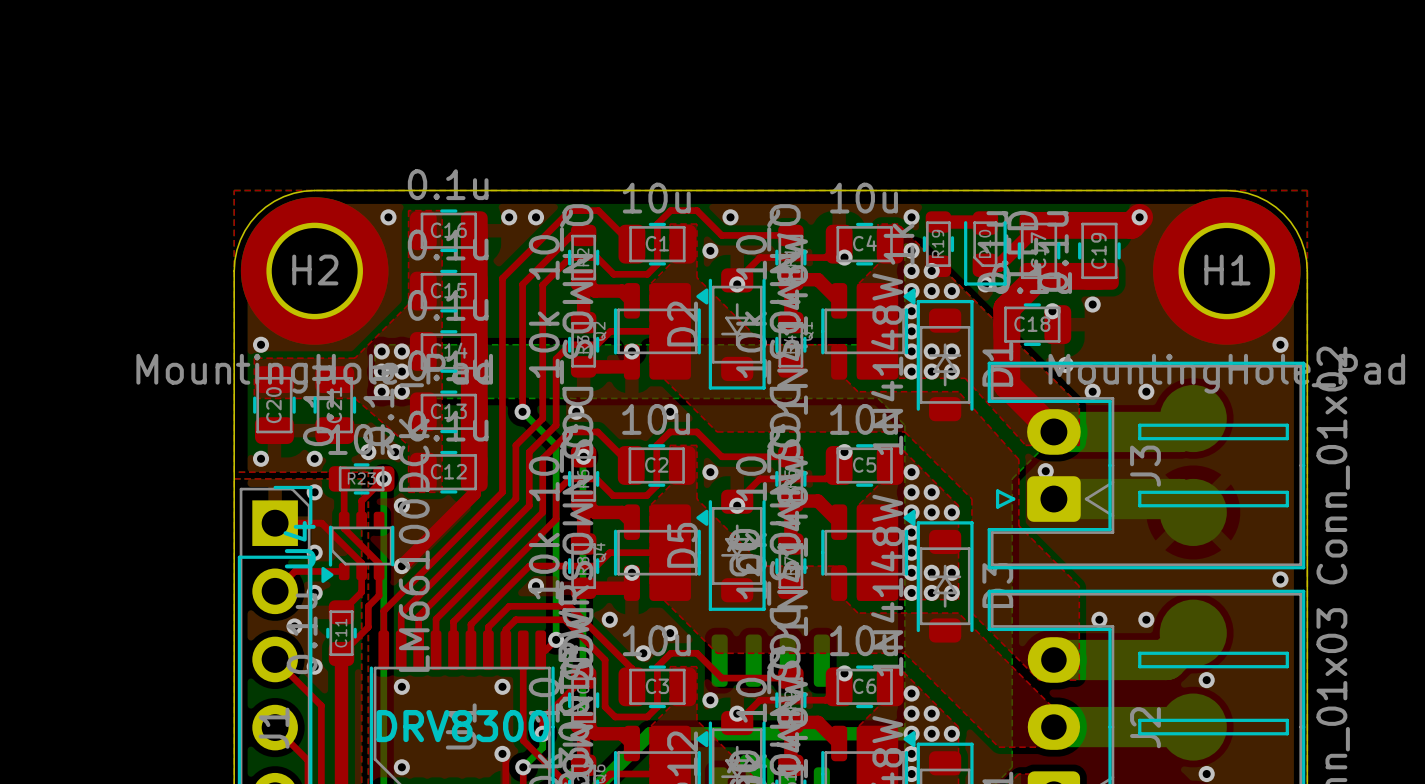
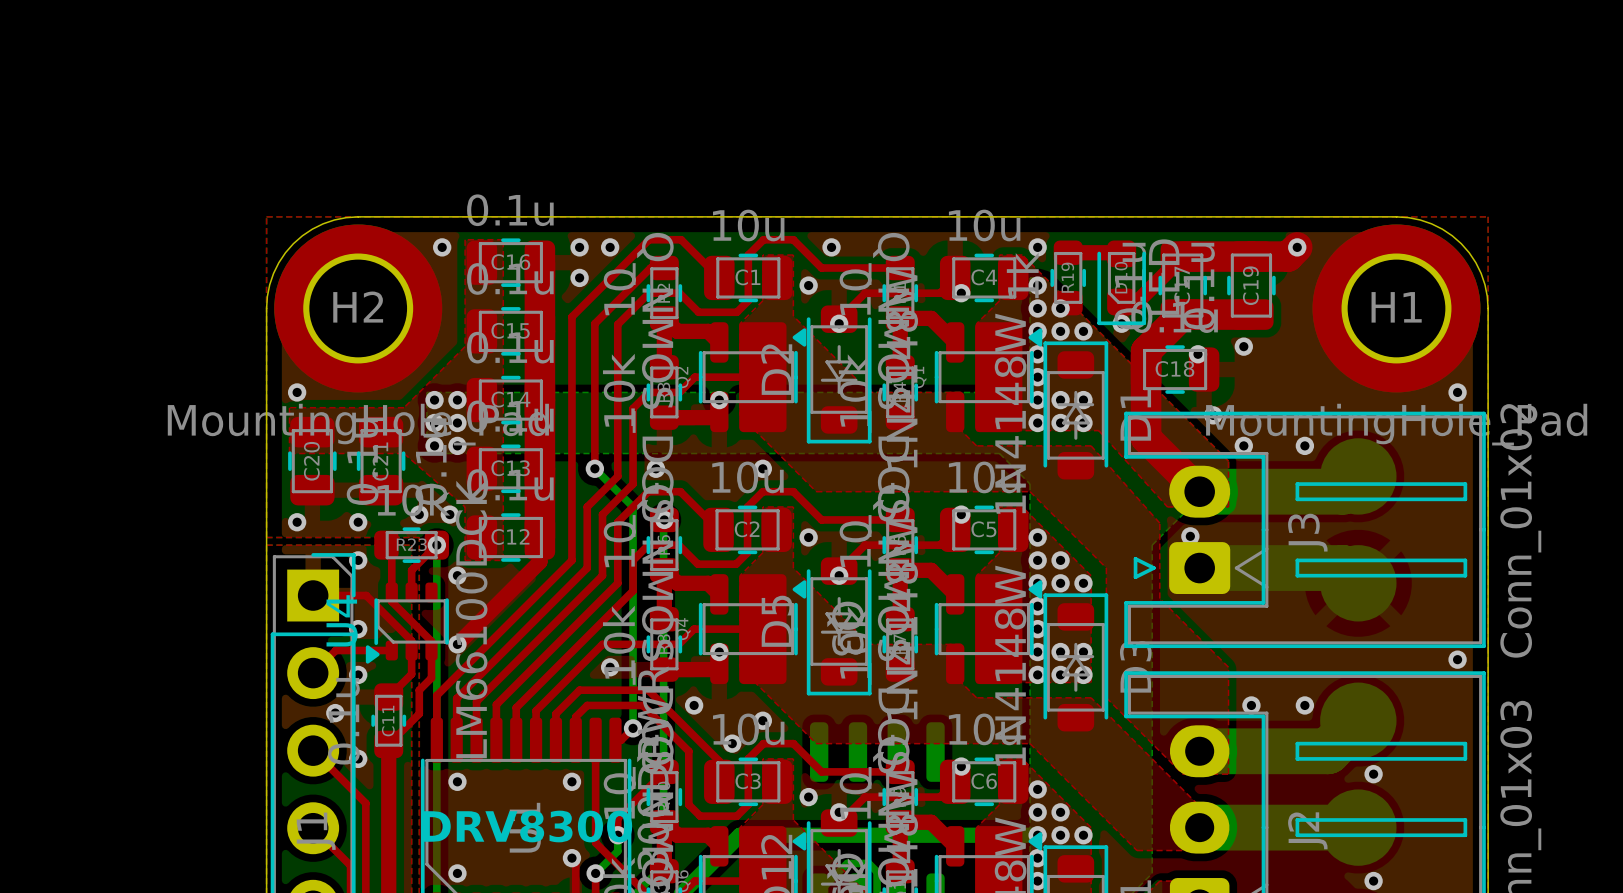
via: none -> (579, 277)

